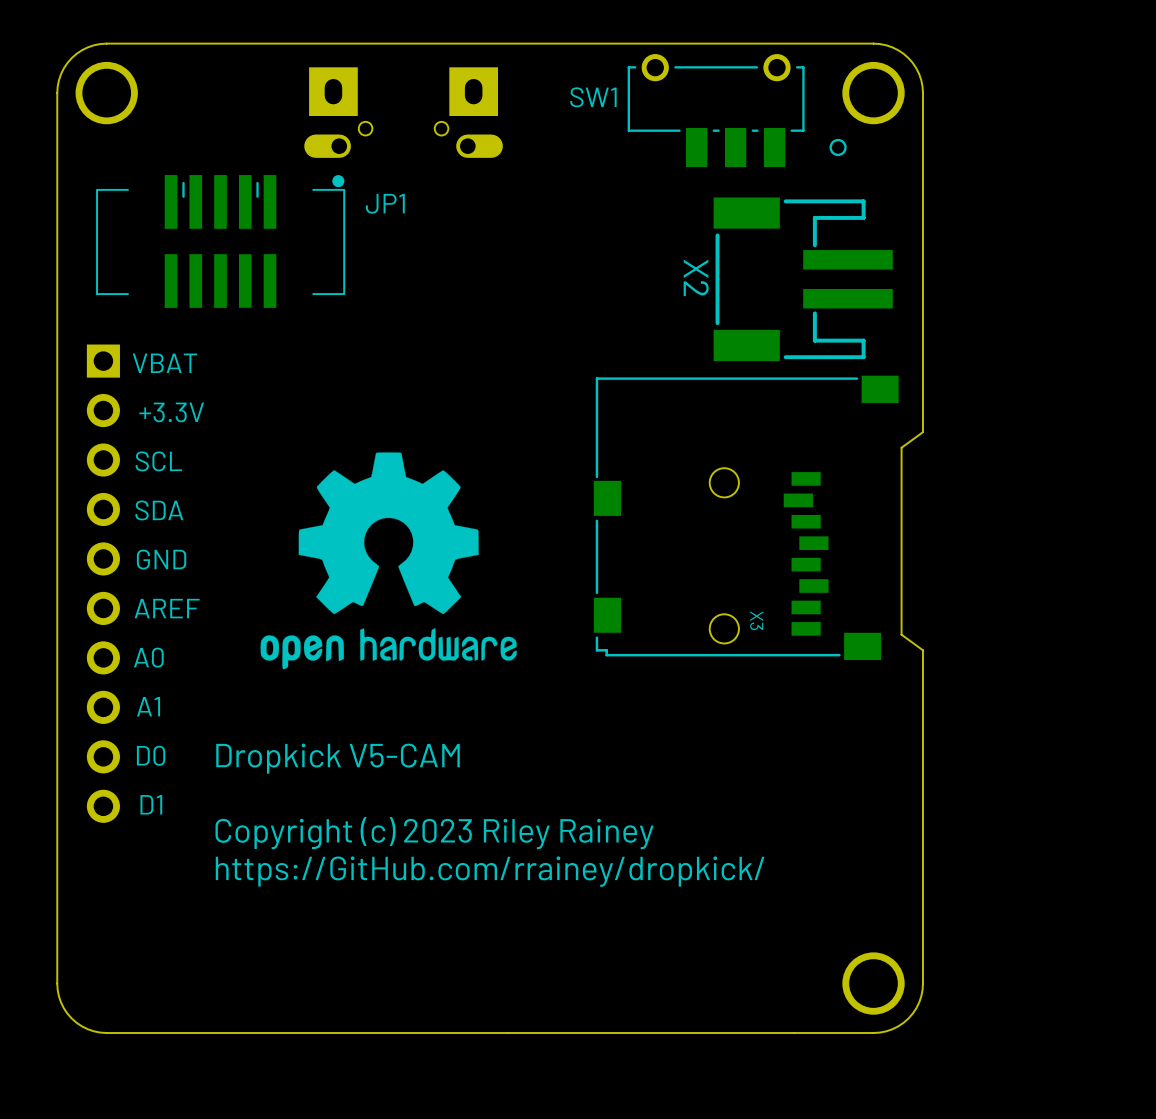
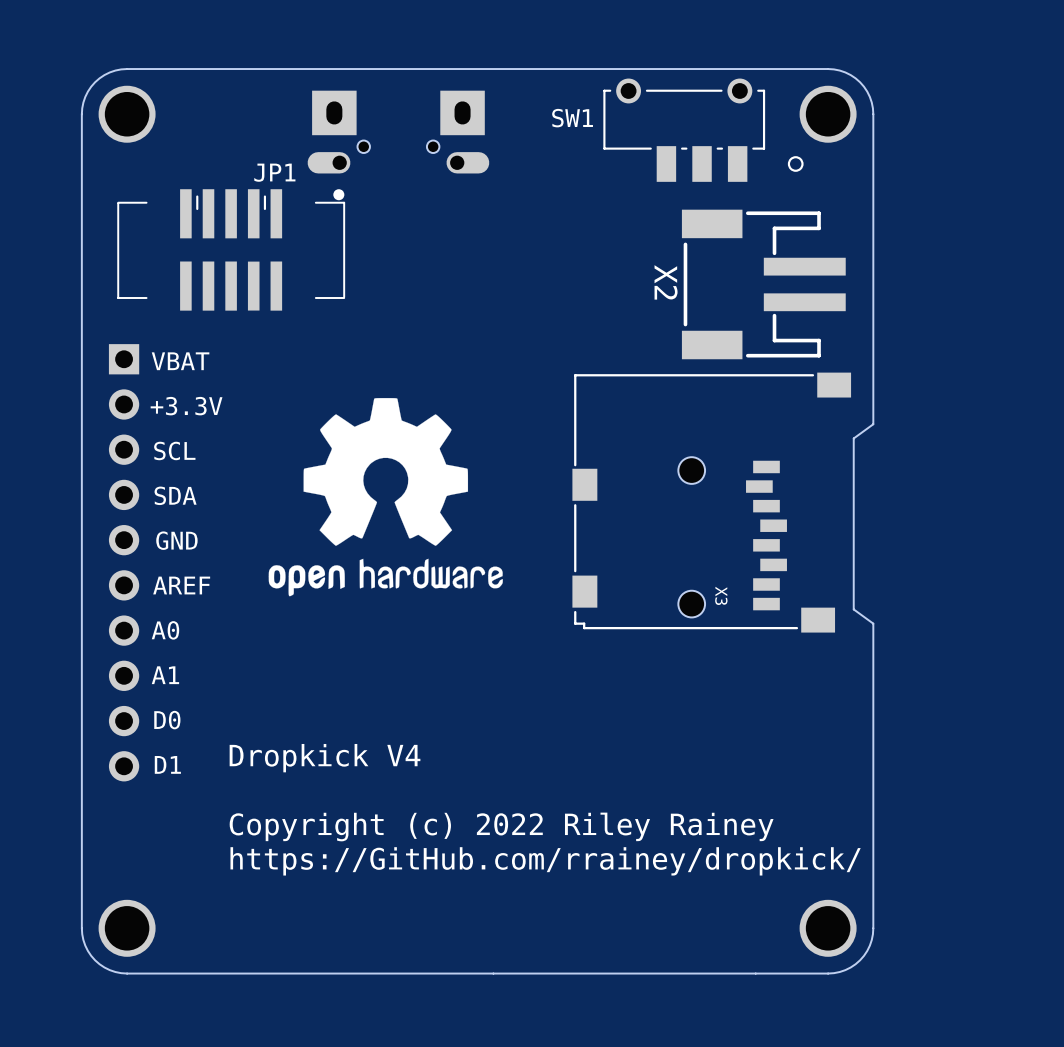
JP1 name position: JP1 (385, 203) -> JP1 (274, 172)
drawing position: (388, 560) -> (385, 497)
text: Dropkick V5-CAM (338, 758) -> Dropkick V4 (325, 758)
text: Copyright (c) 2023 Riley Rainey (434, 833) -> none
text: https://GitHub.com/rrainey/dropkick/ (490, 871) -> Copyright (c) 2022 Riley Rainey (501, 826)
text: none -> https://GitHub.com/rrainey/dropkick/ (545, 861)
part: none -> (127, 928)

